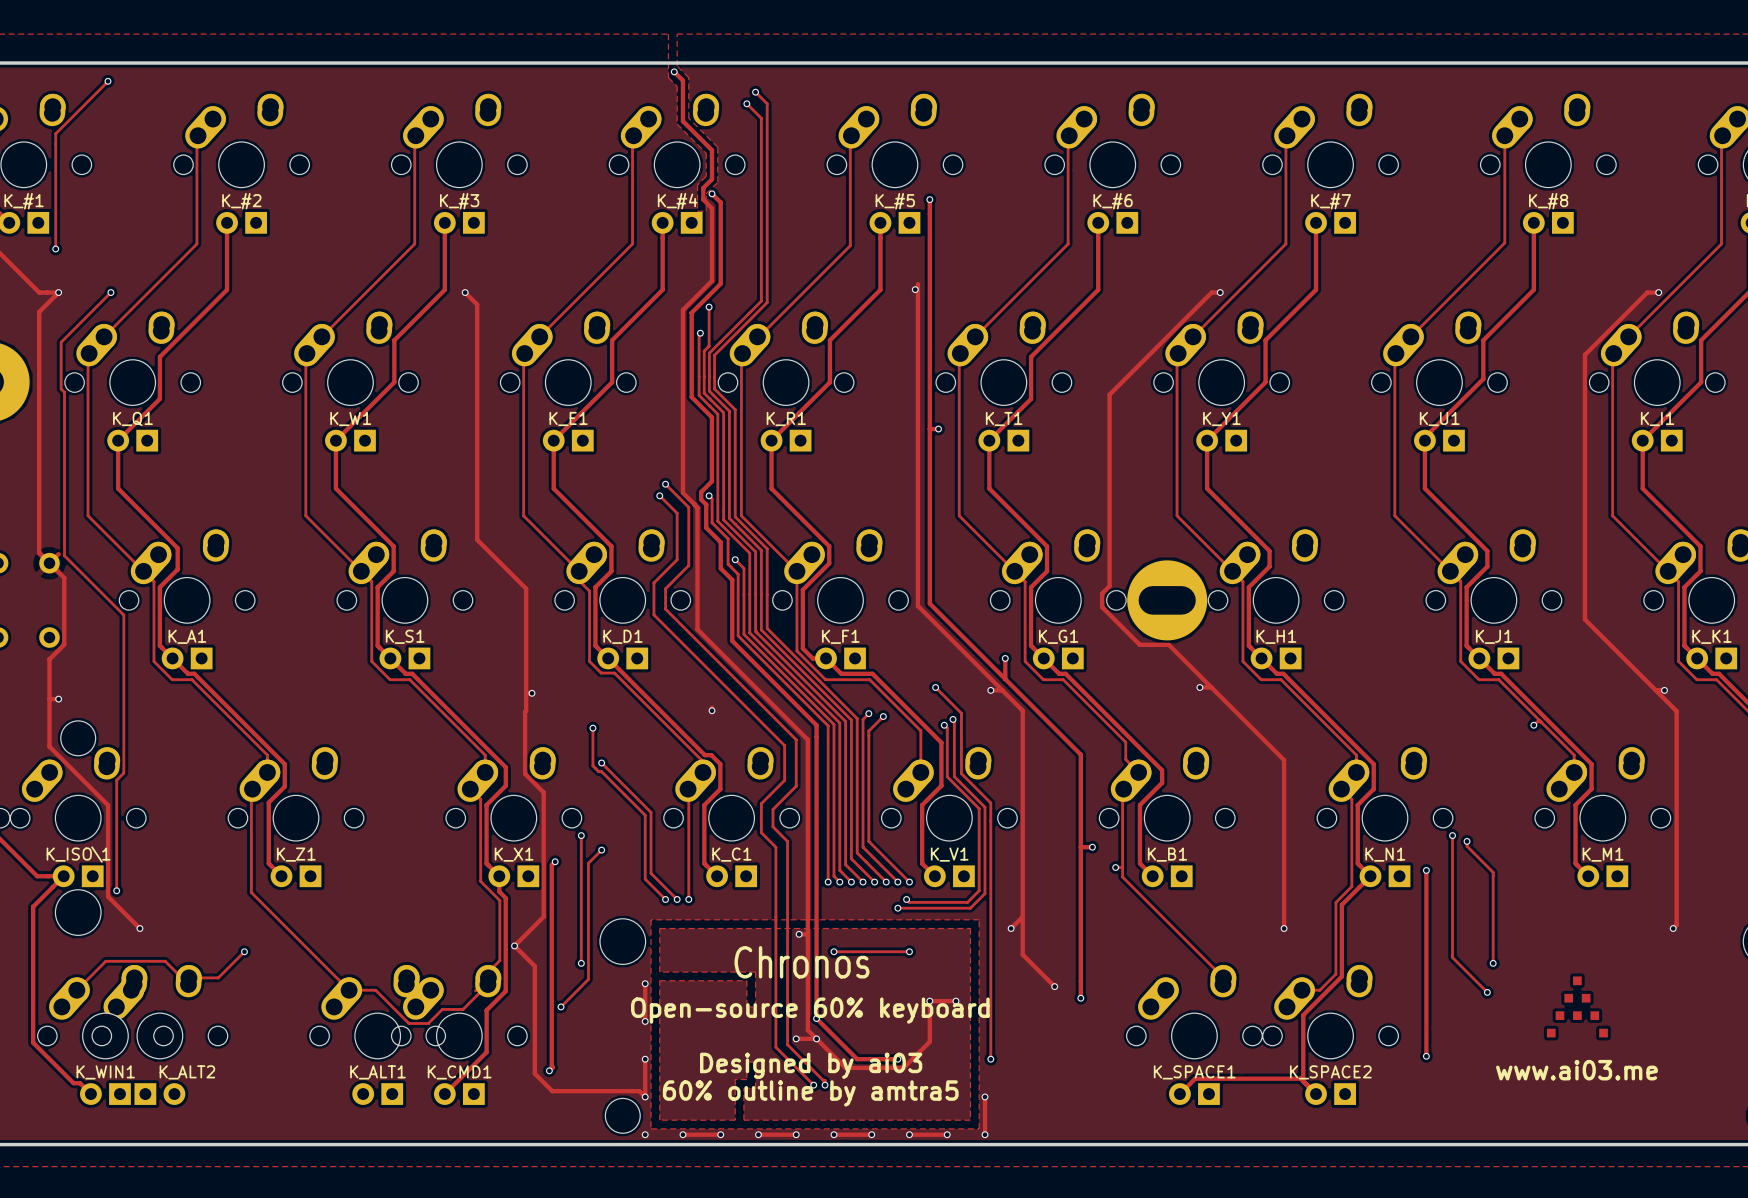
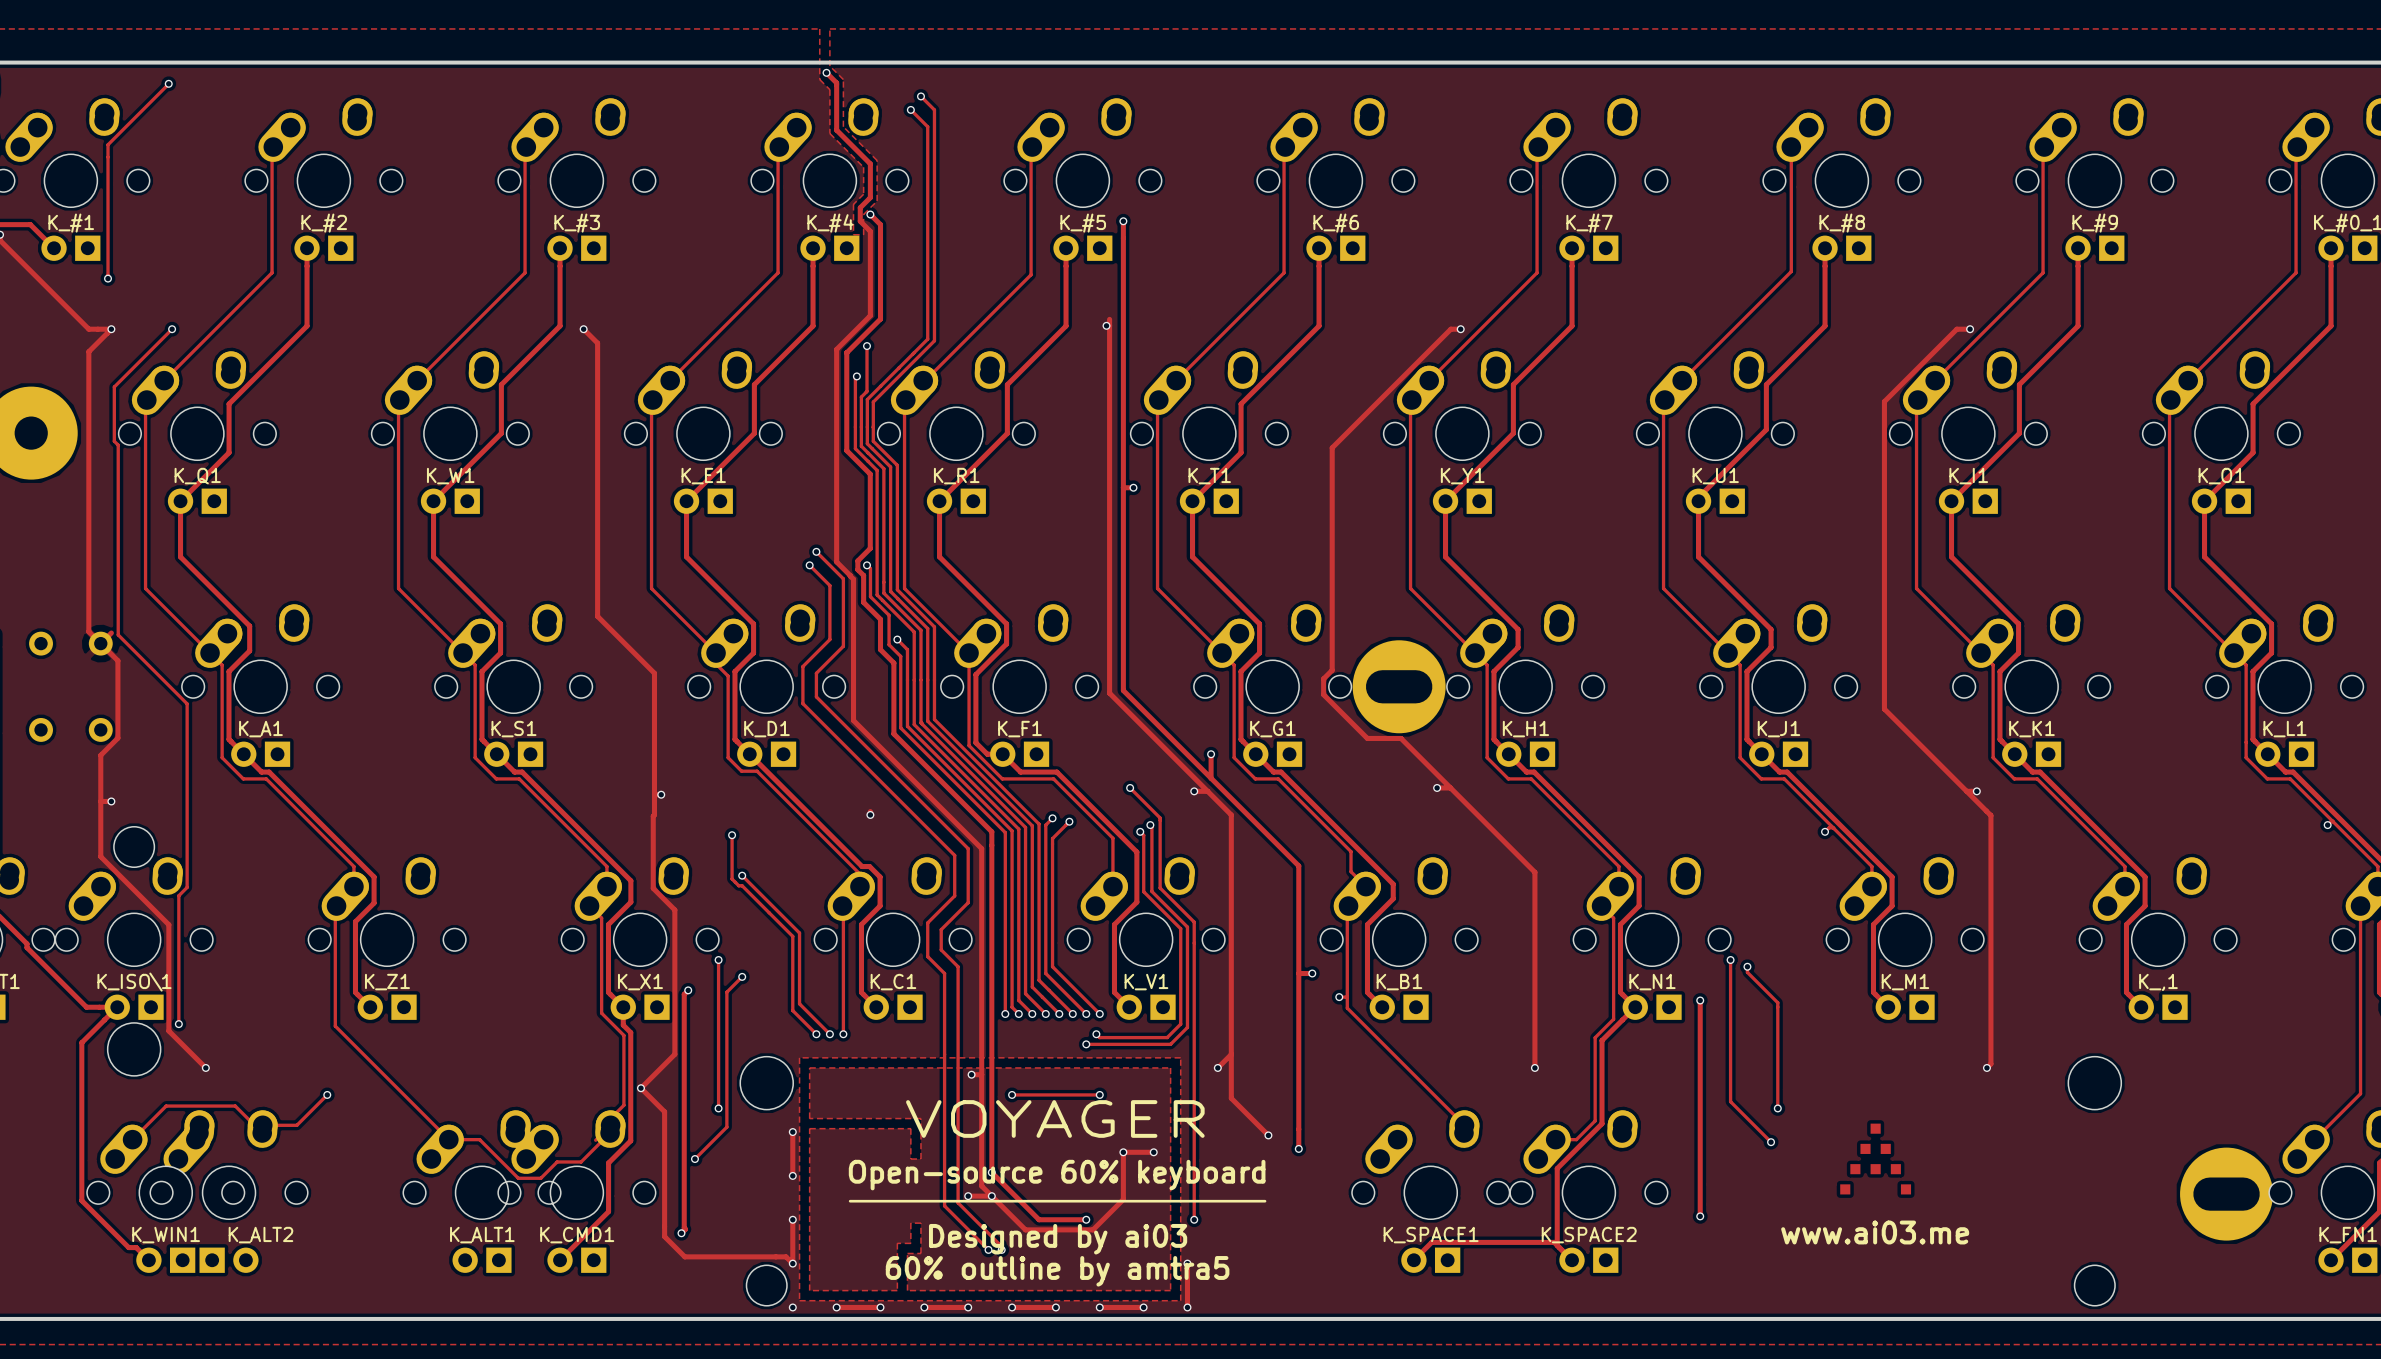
text: Chronos (802, 962) -> none
text: none -> VOYAGER (1055, 1118)
text position: Open-source 60% keyboard (810, 1010) -> Open-source 60% keyboard (1057, 1175)
line: none -> (850, 1201) (1265, 1201)
text position: Designed by ai03 (811, 1065) -> Designed by ai03 (1058, 1239)
text position: 60% outline by amtra5 (810, 1093) -> 60% outline by amtra5 (1057, 1271)

